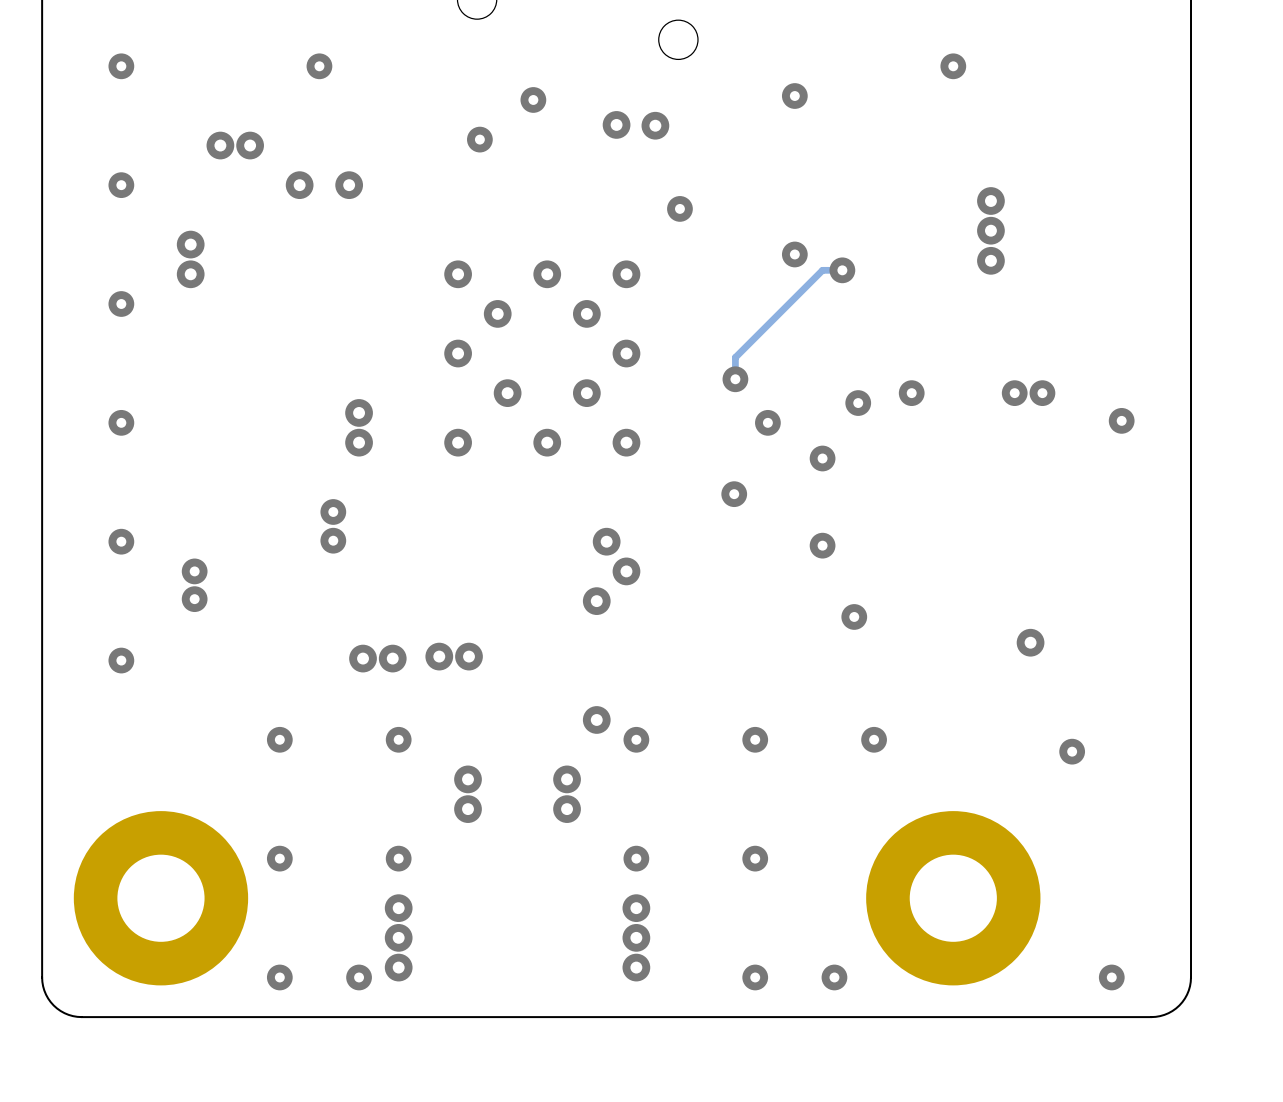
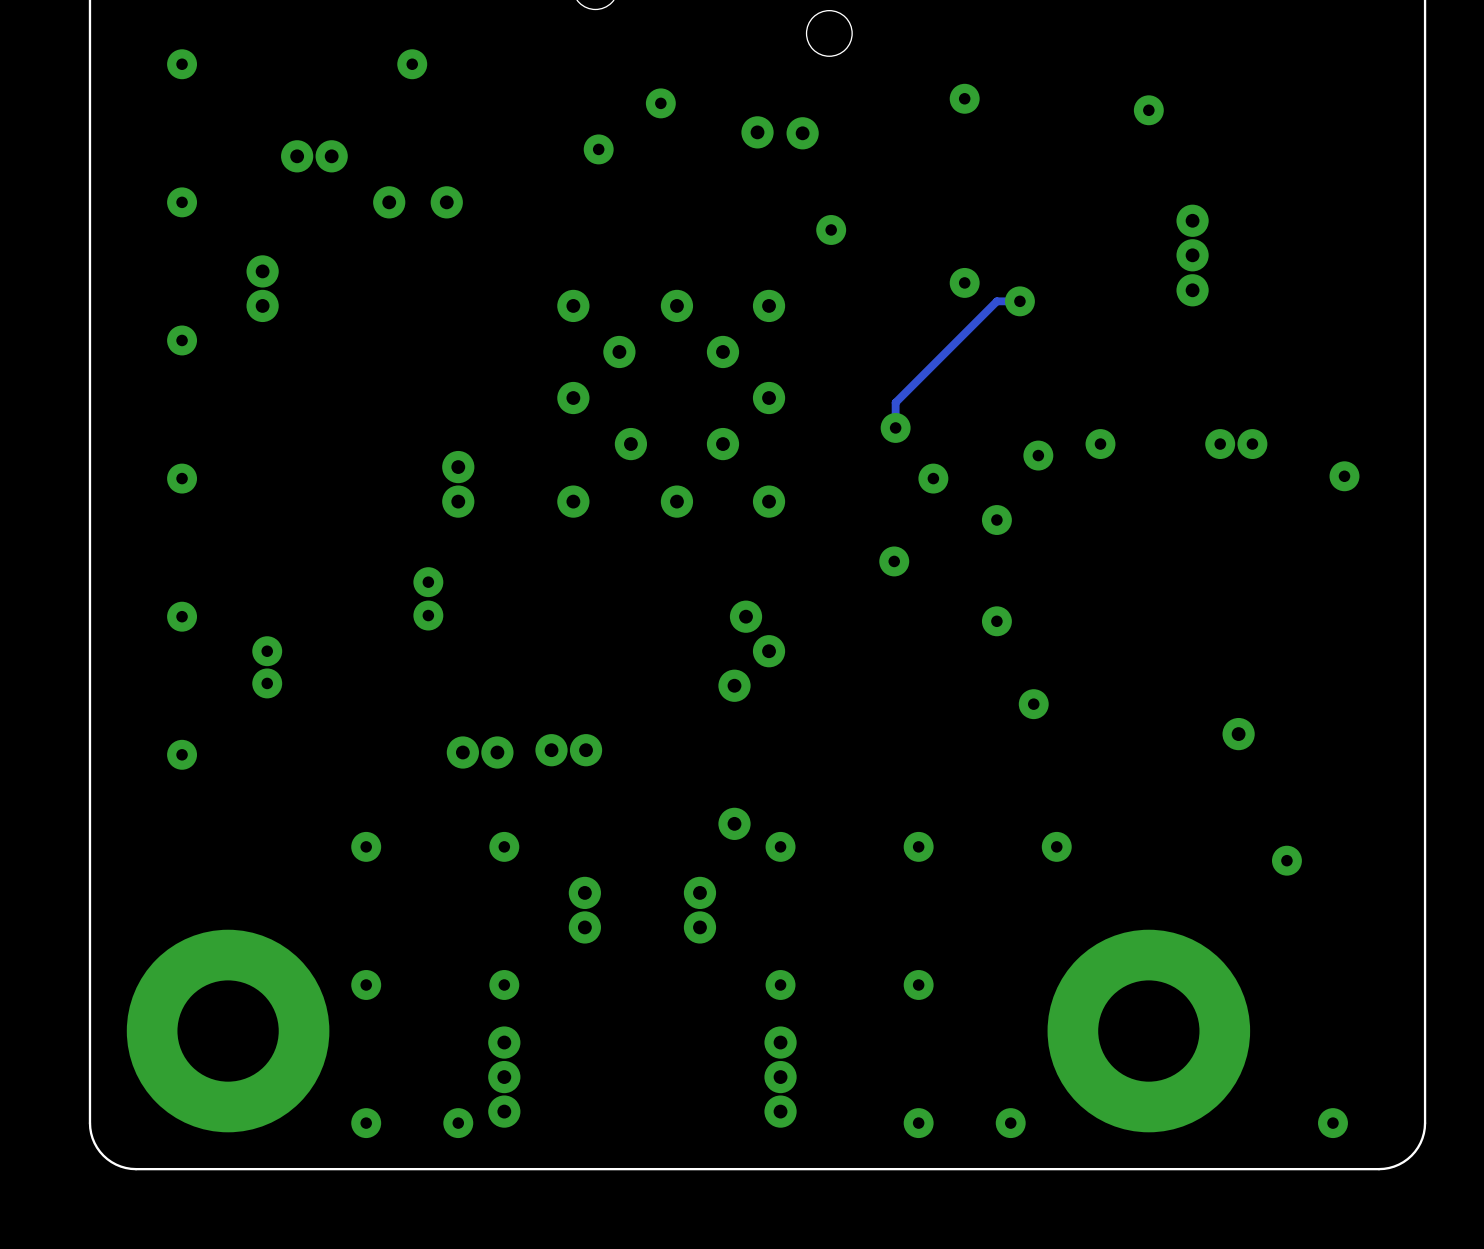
via position: (953, 66) -> (1148, 110)

